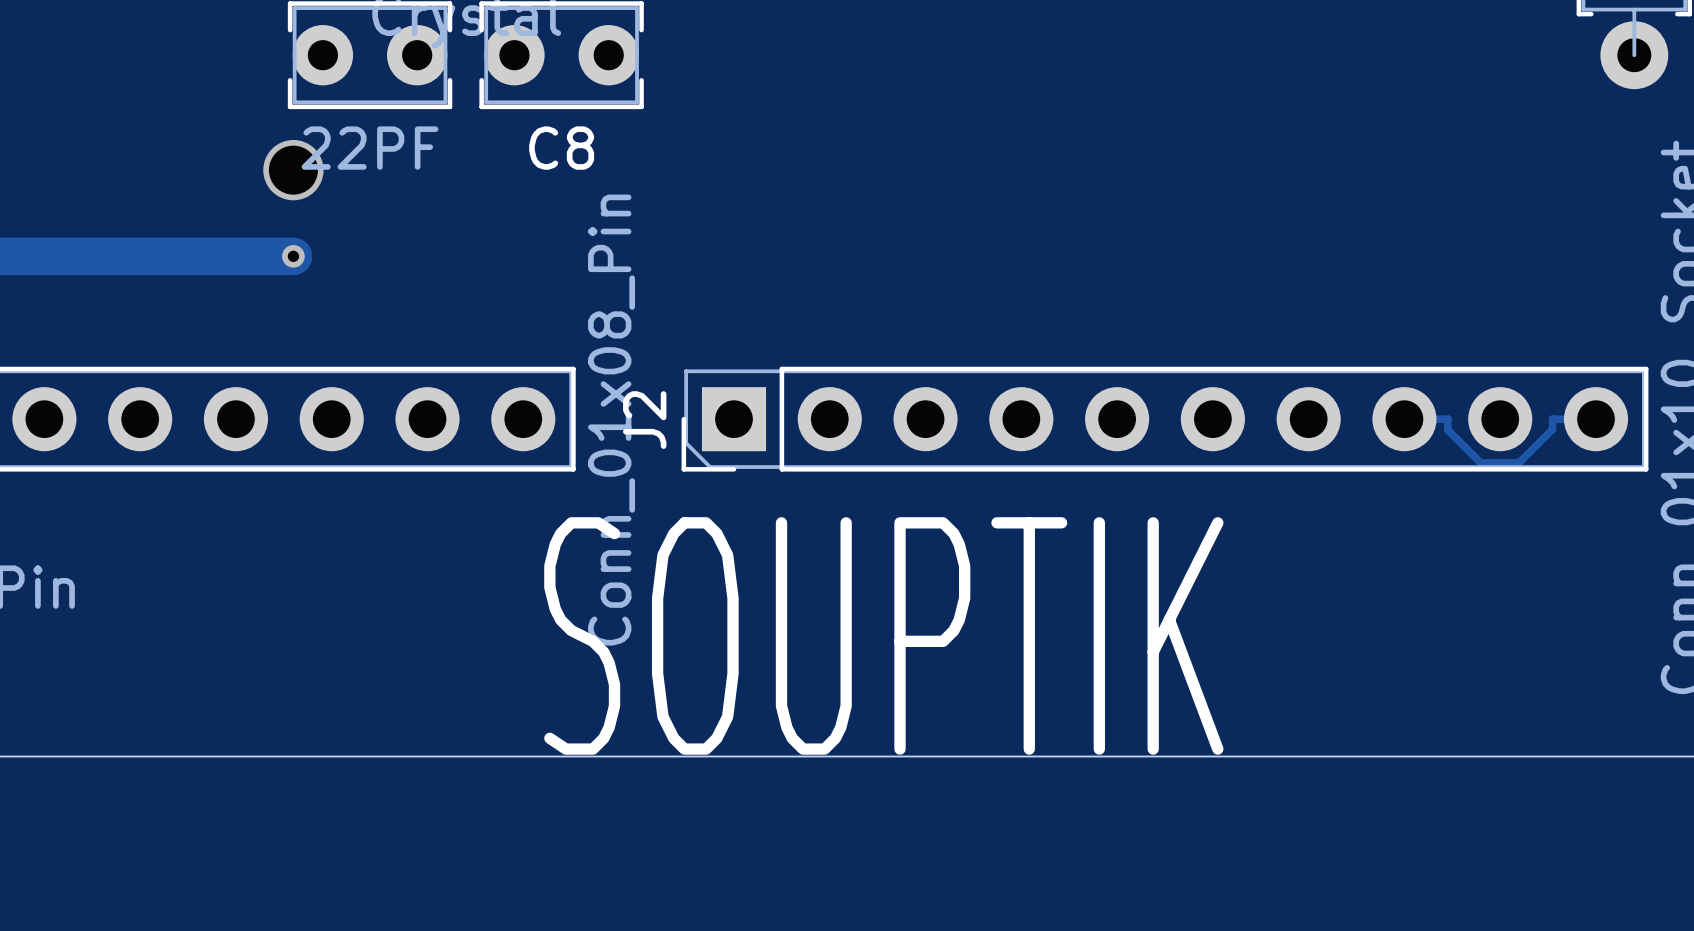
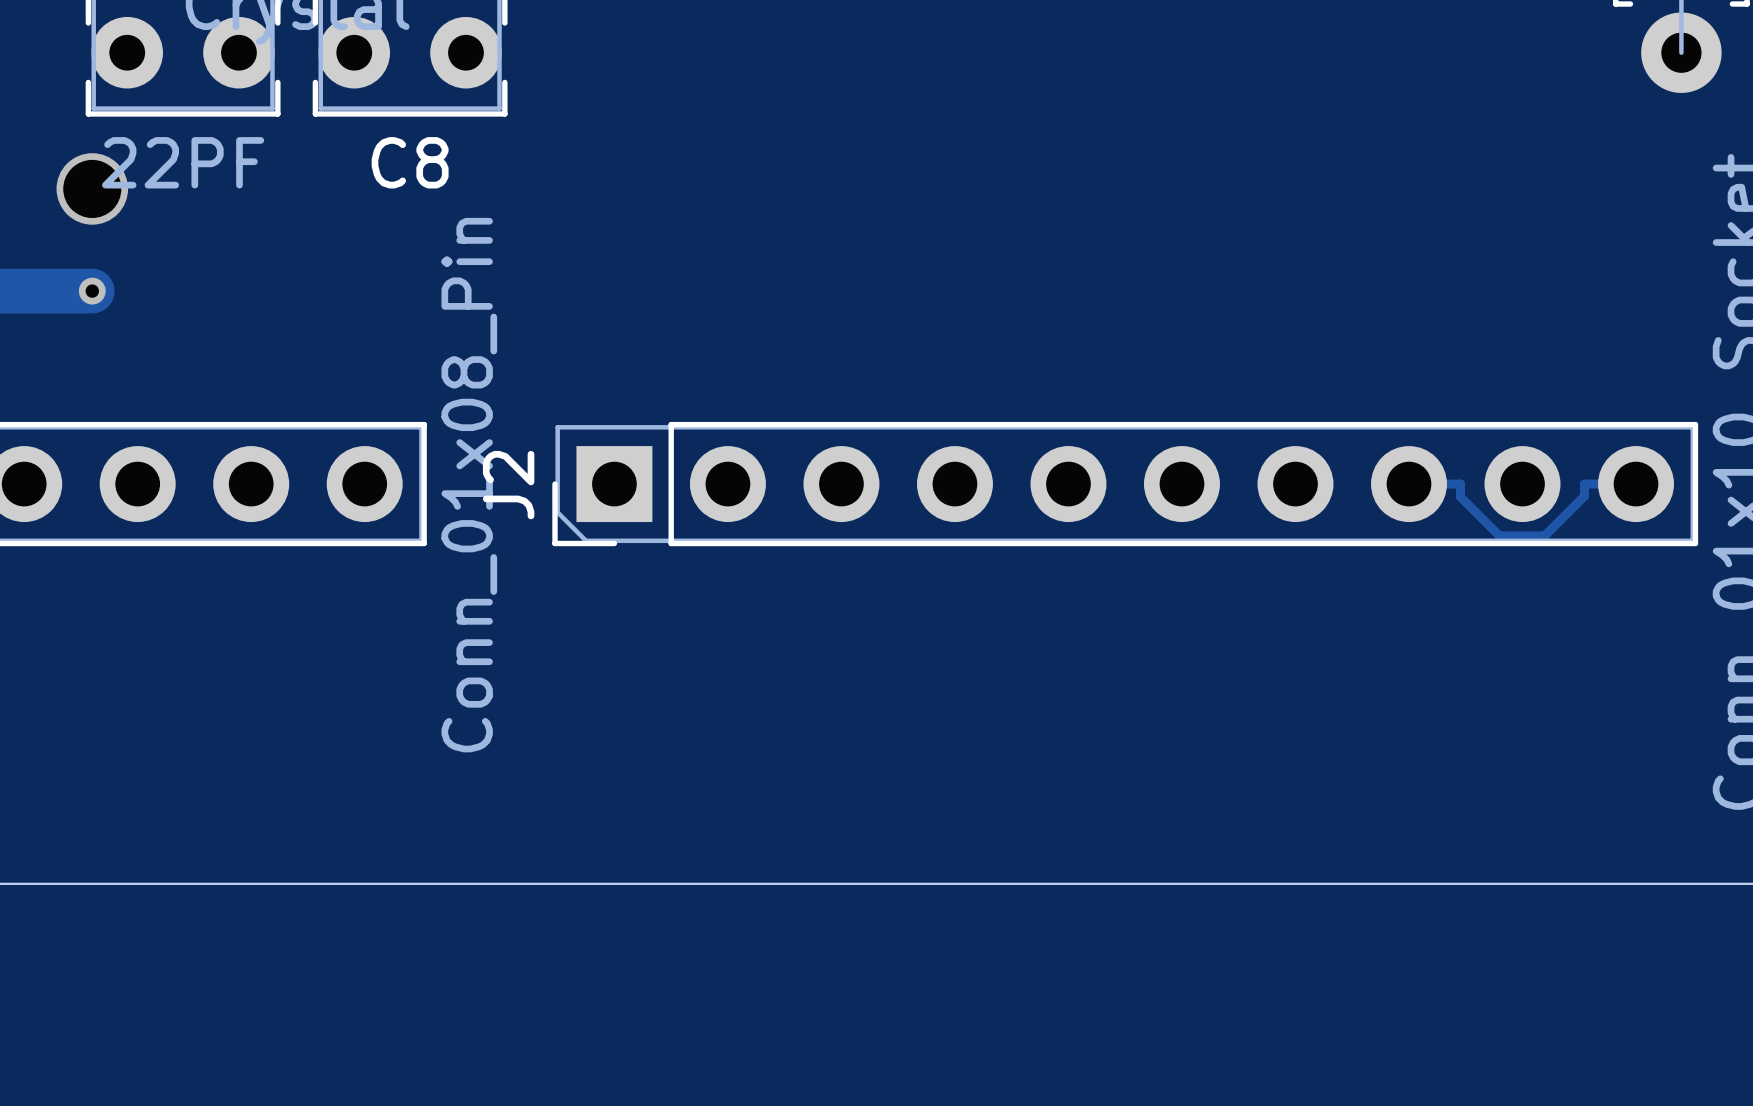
text: SOUPTIK (883, 635) -> none

